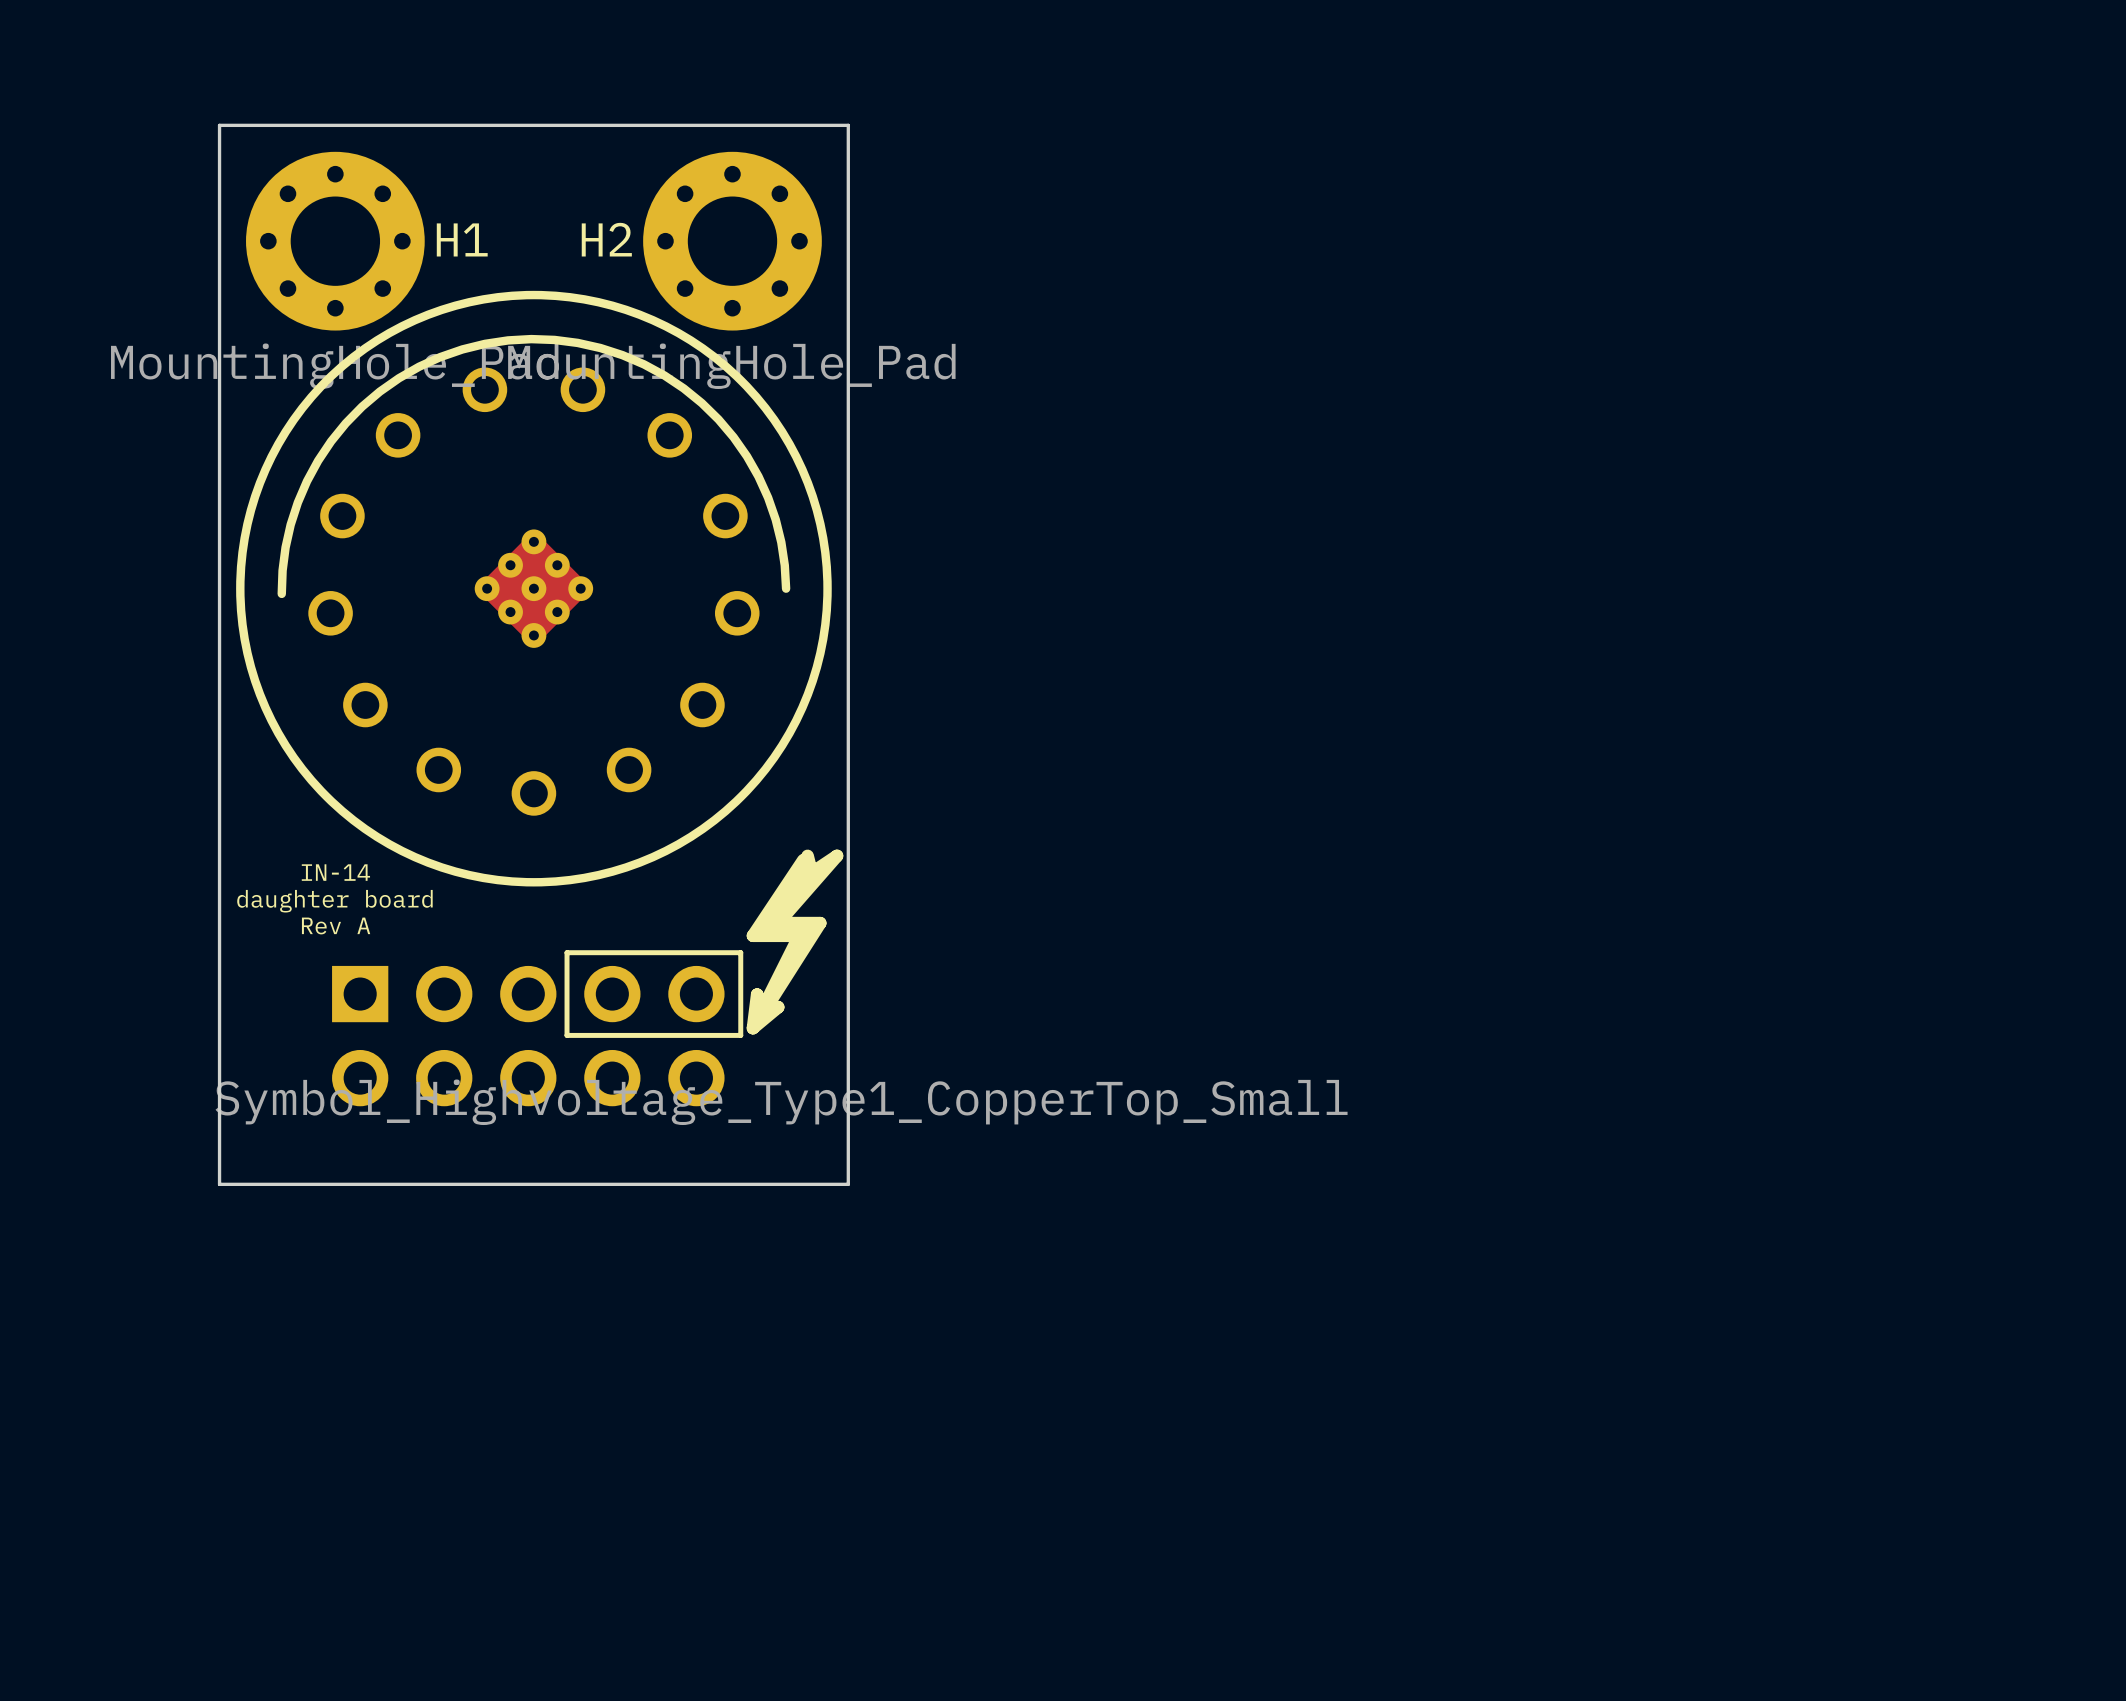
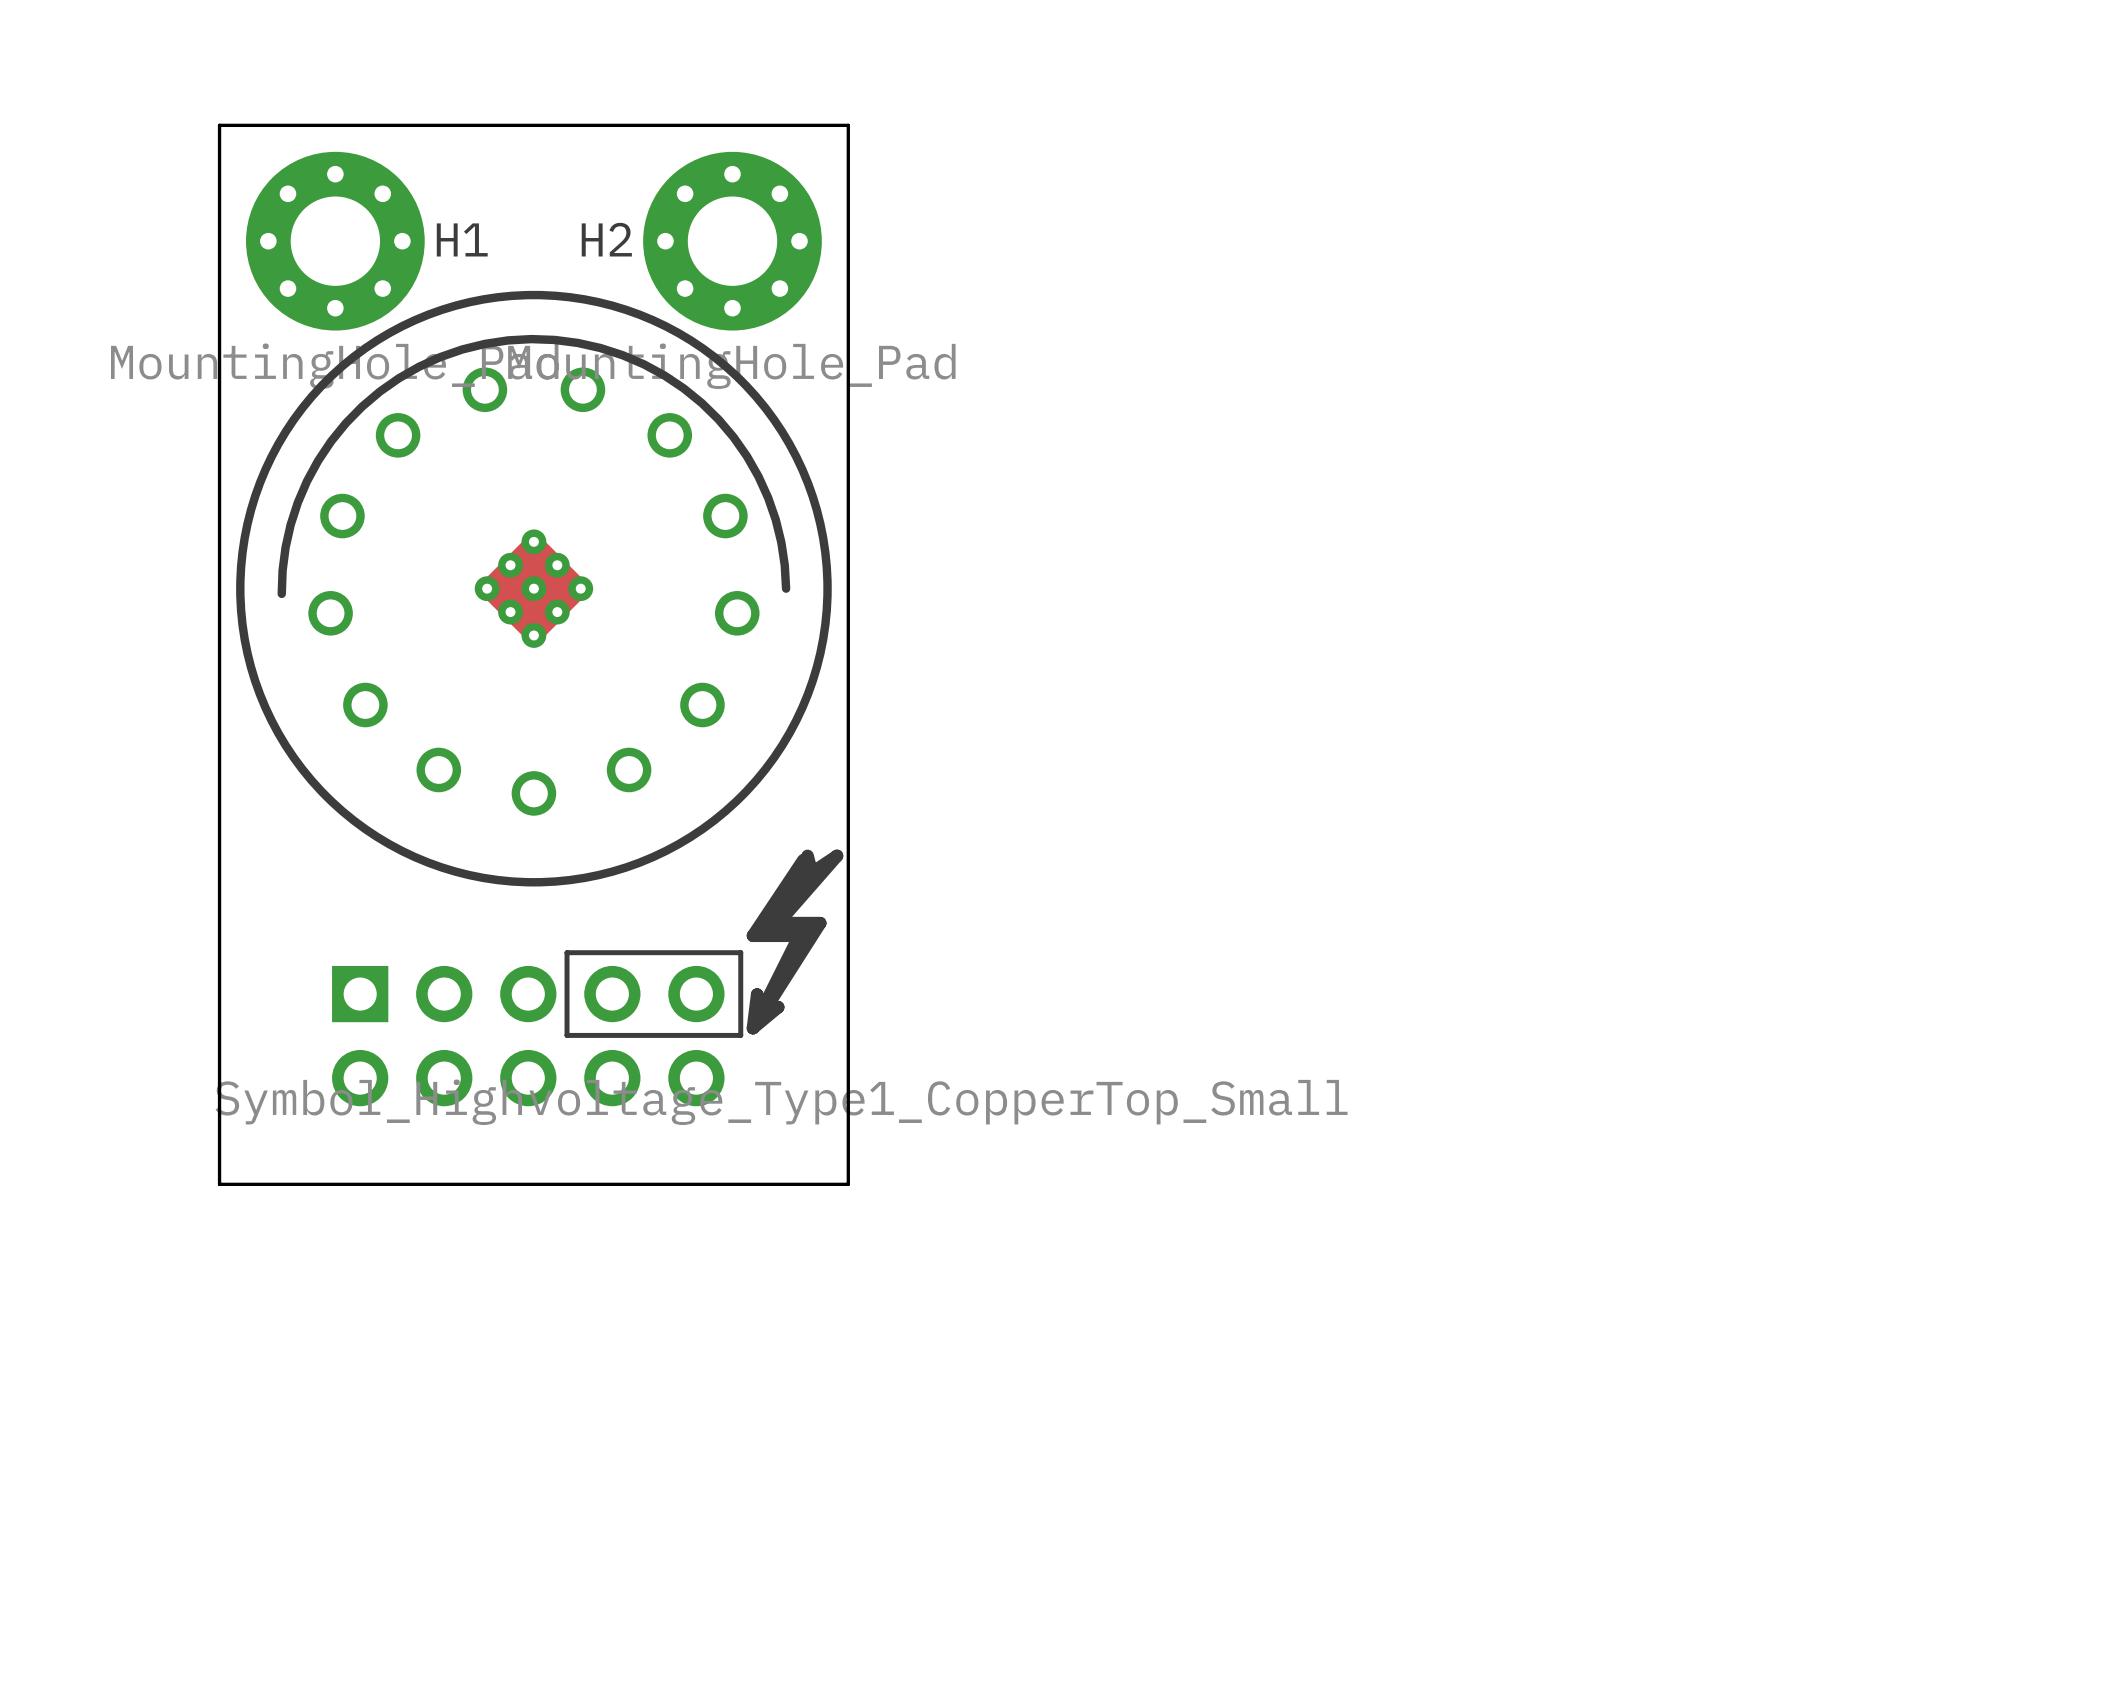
text: IN-14 (335, 872) -> none
text: daughter board (334, 901) -> none
text: Rev A (336, 925) -> none

